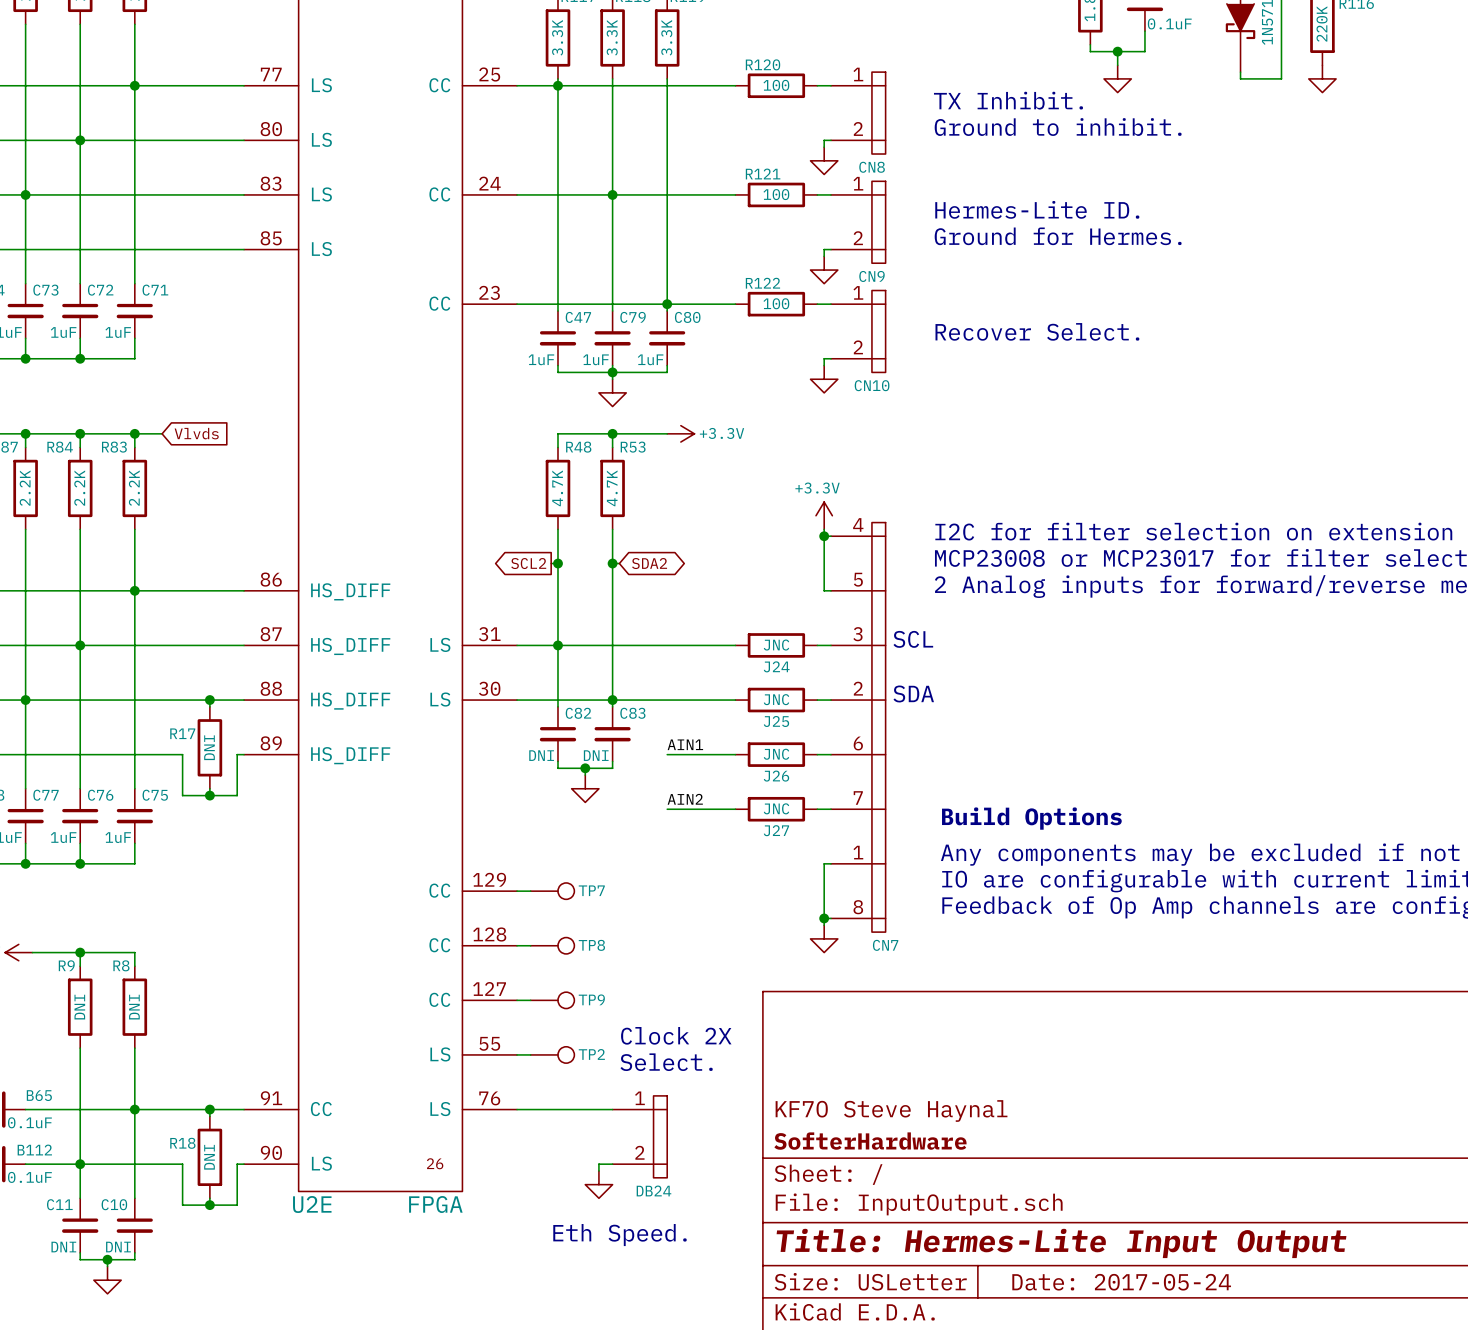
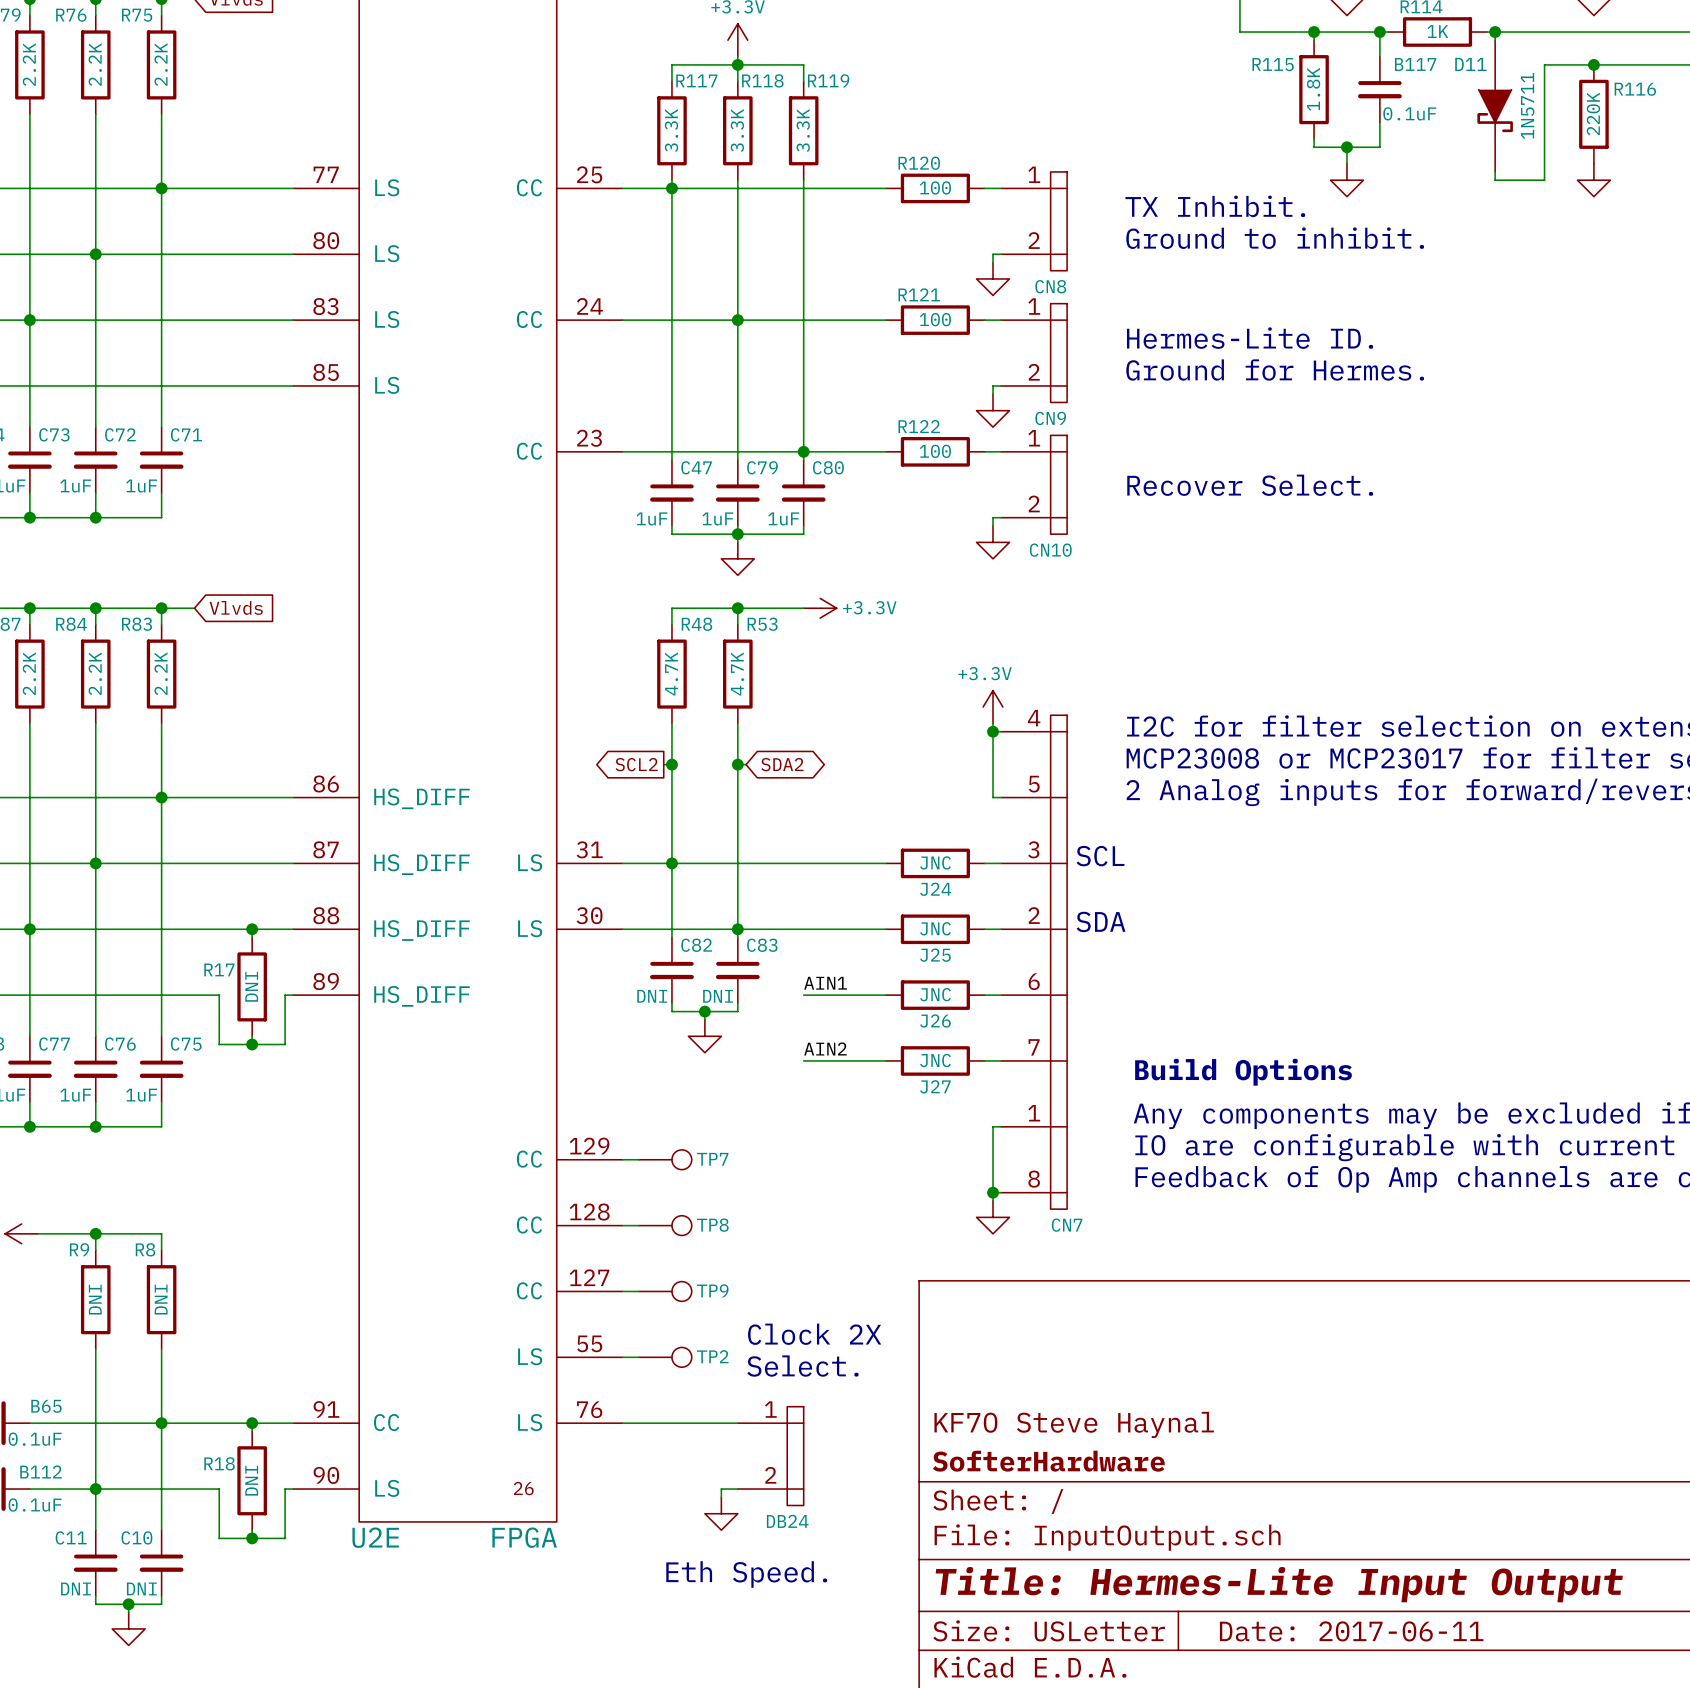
title block: Date: 2017-05-24 (1121, 1282) -> Date: 2017-06-11 (1351, 1631)

